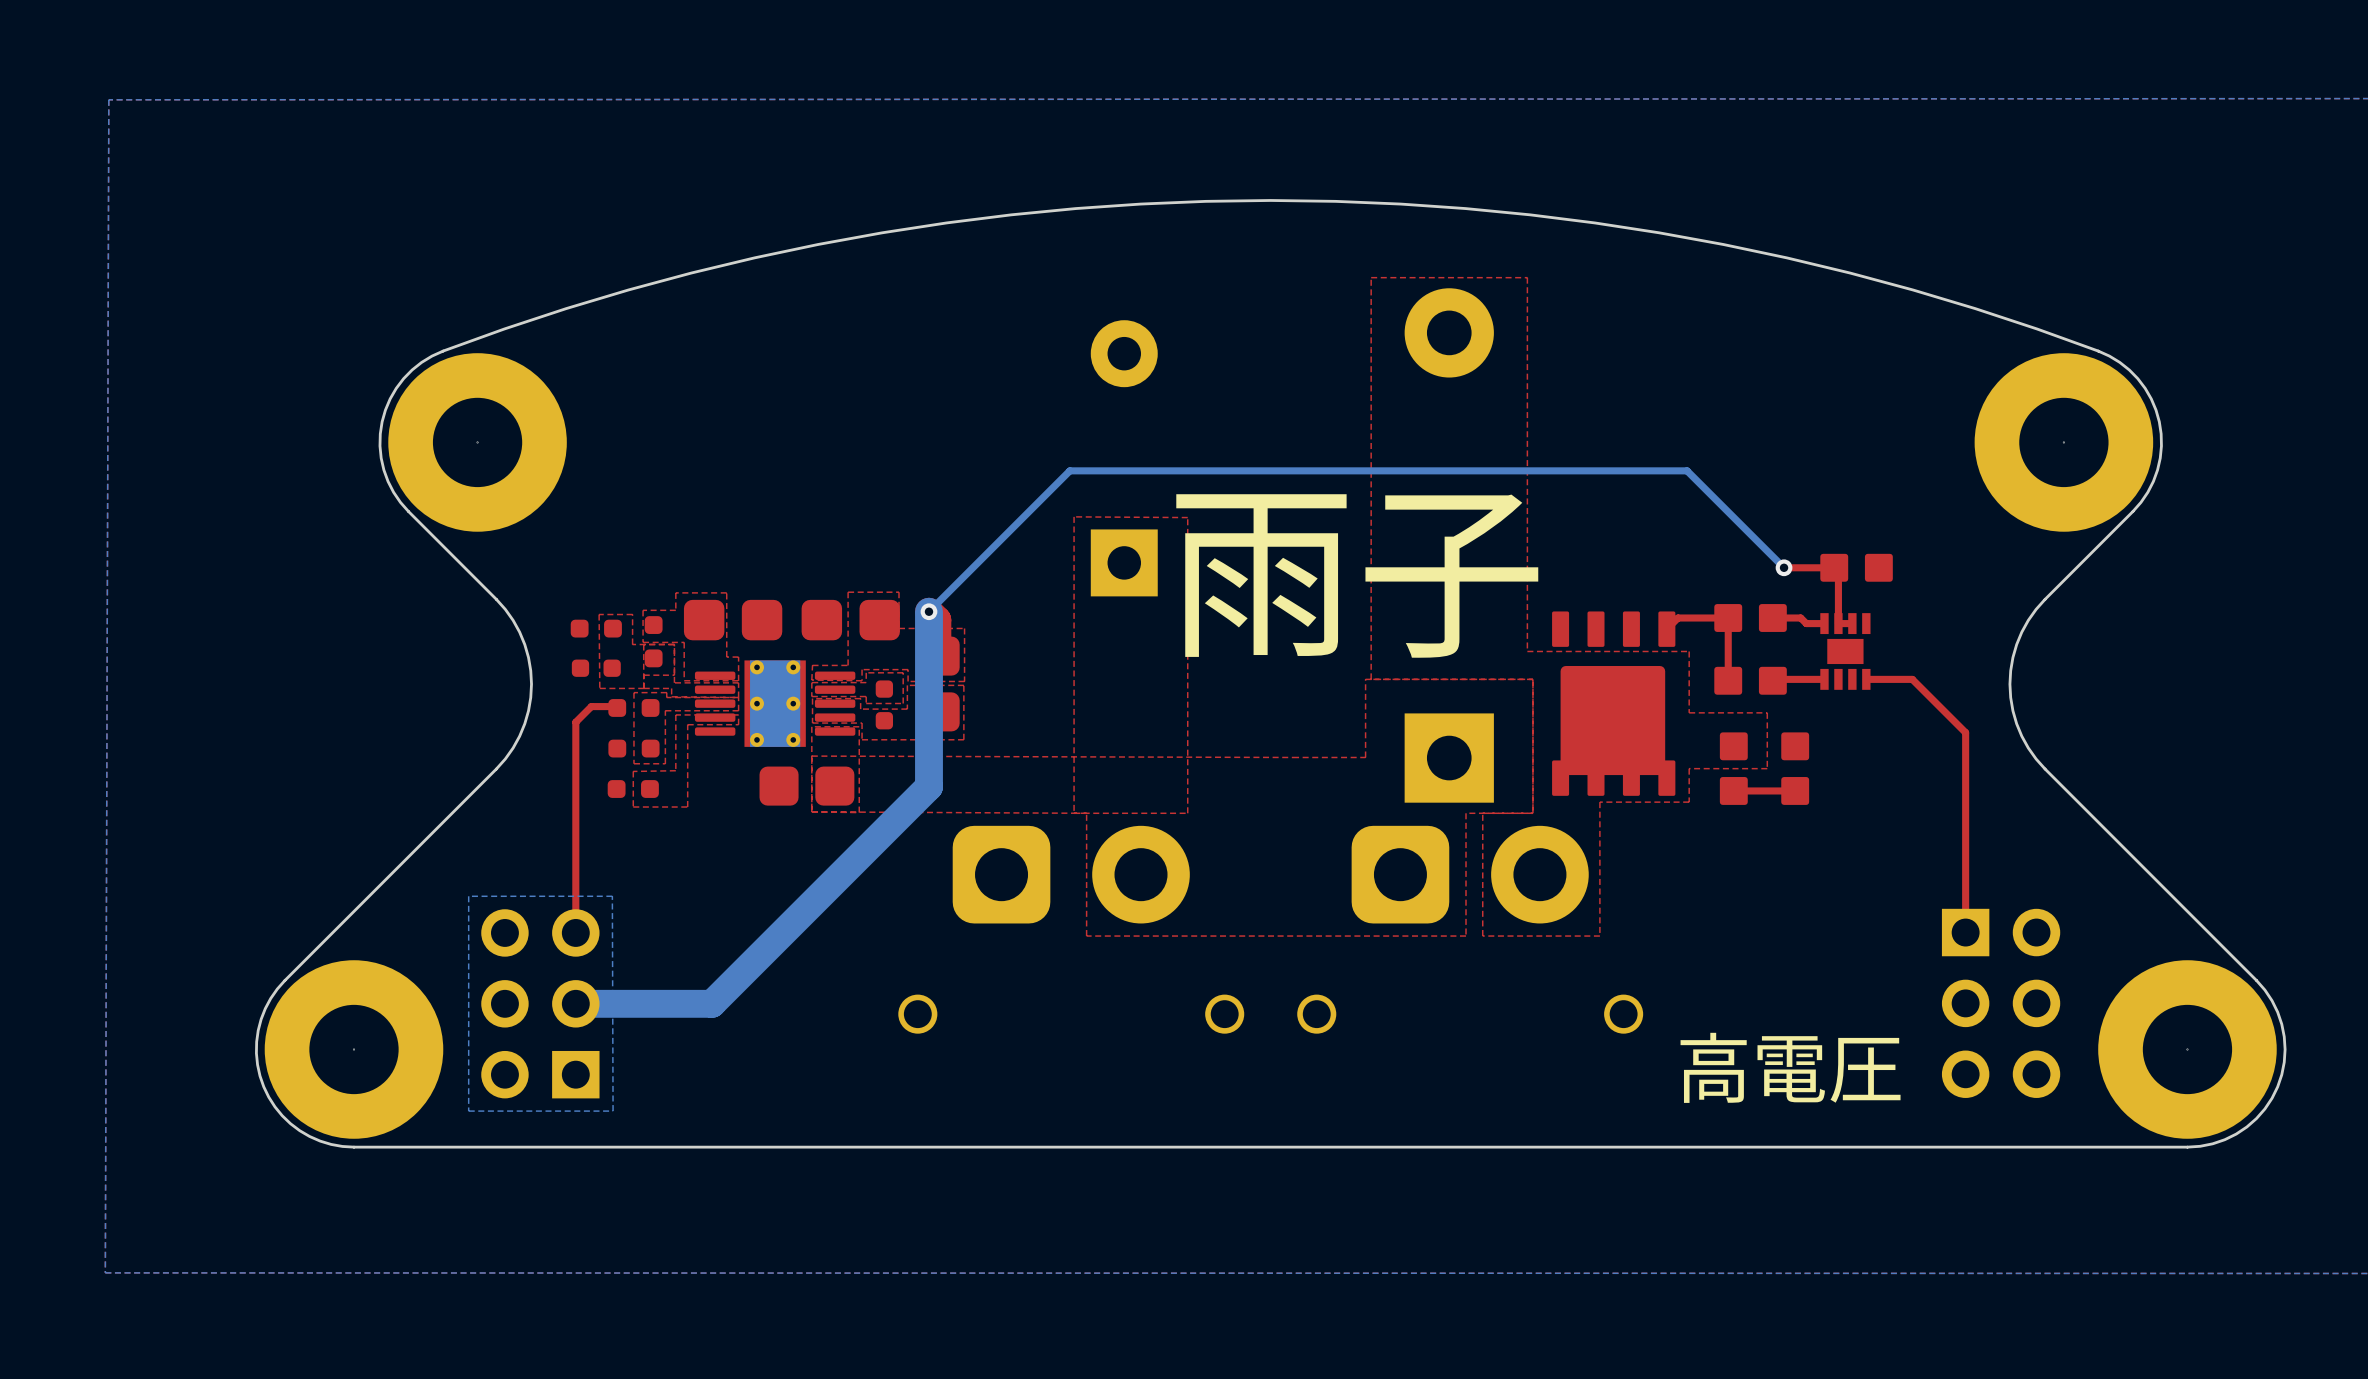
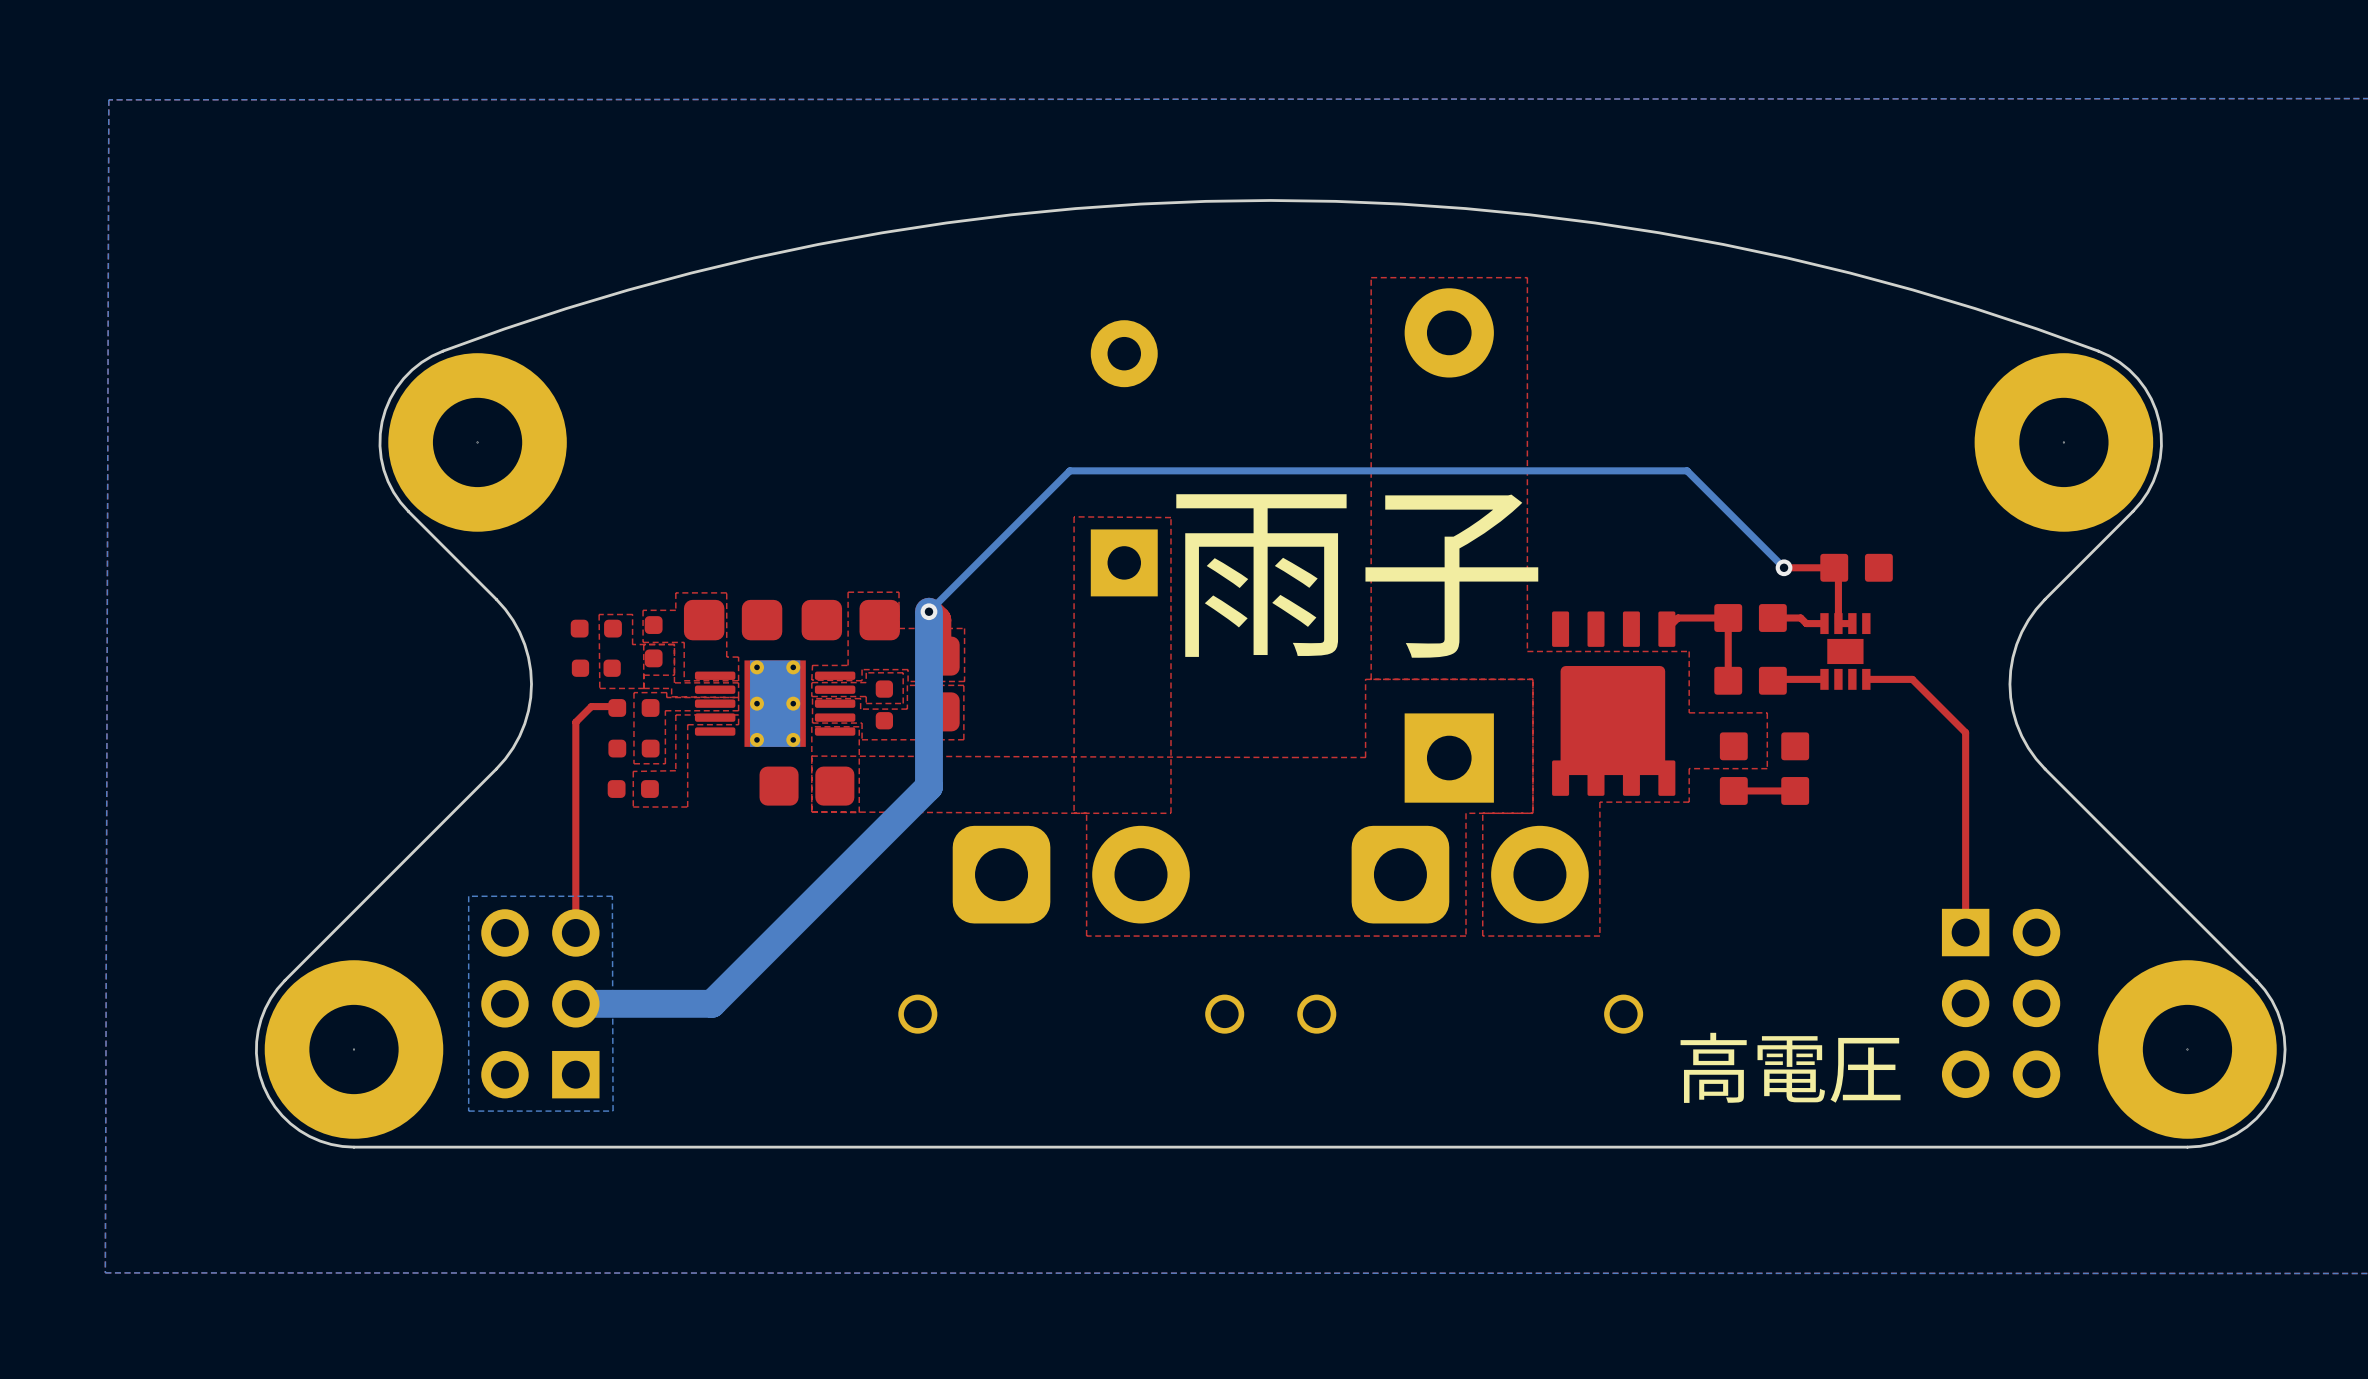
top zone outline: (1074, 516) (1187, 517) (1187, 813) (1171, 813) -> (1074, 516) (1171, 517) (1171, 813)

